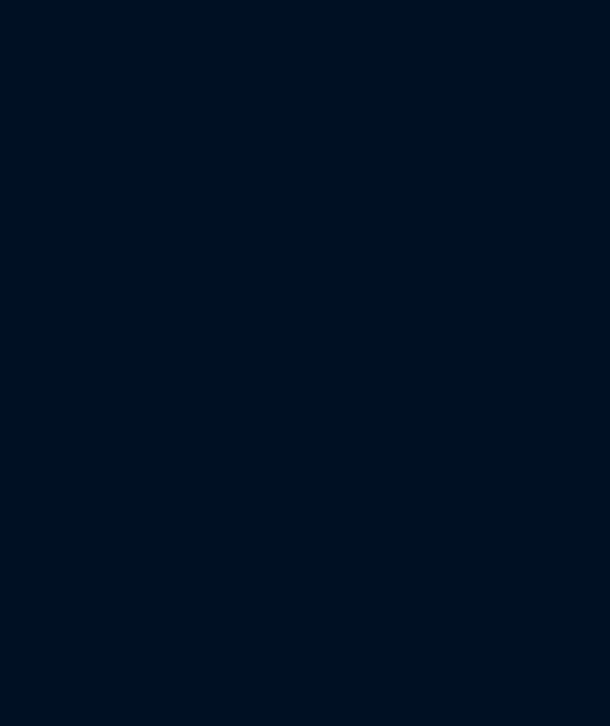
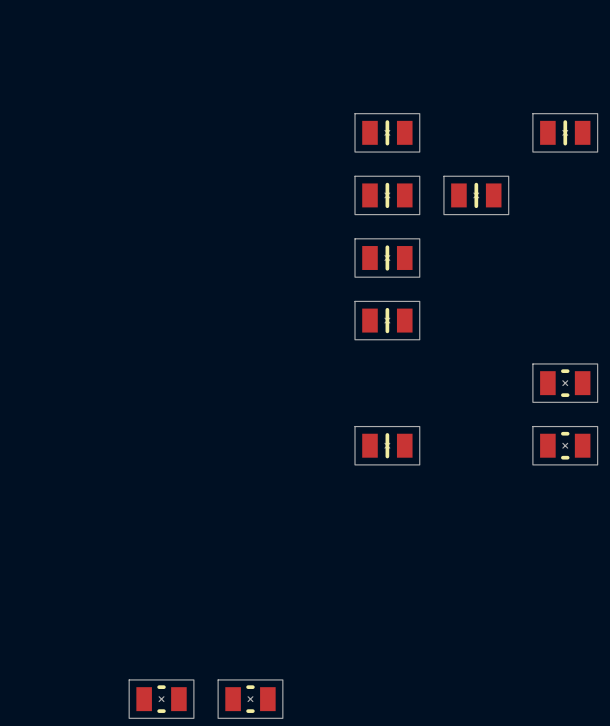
part: none -> (387, 132)
part: none -> (565, 132)
part: none -> (387, 195)
part: none -> (476, 195)
part: none -> (387, 258)
part: none -> (387, 320)
part: none -> (565, 383)
part: none -> (387, 445)
part: none -> (565, 445)
part: none -> (161, 699)
part: none -> (250, 699)

